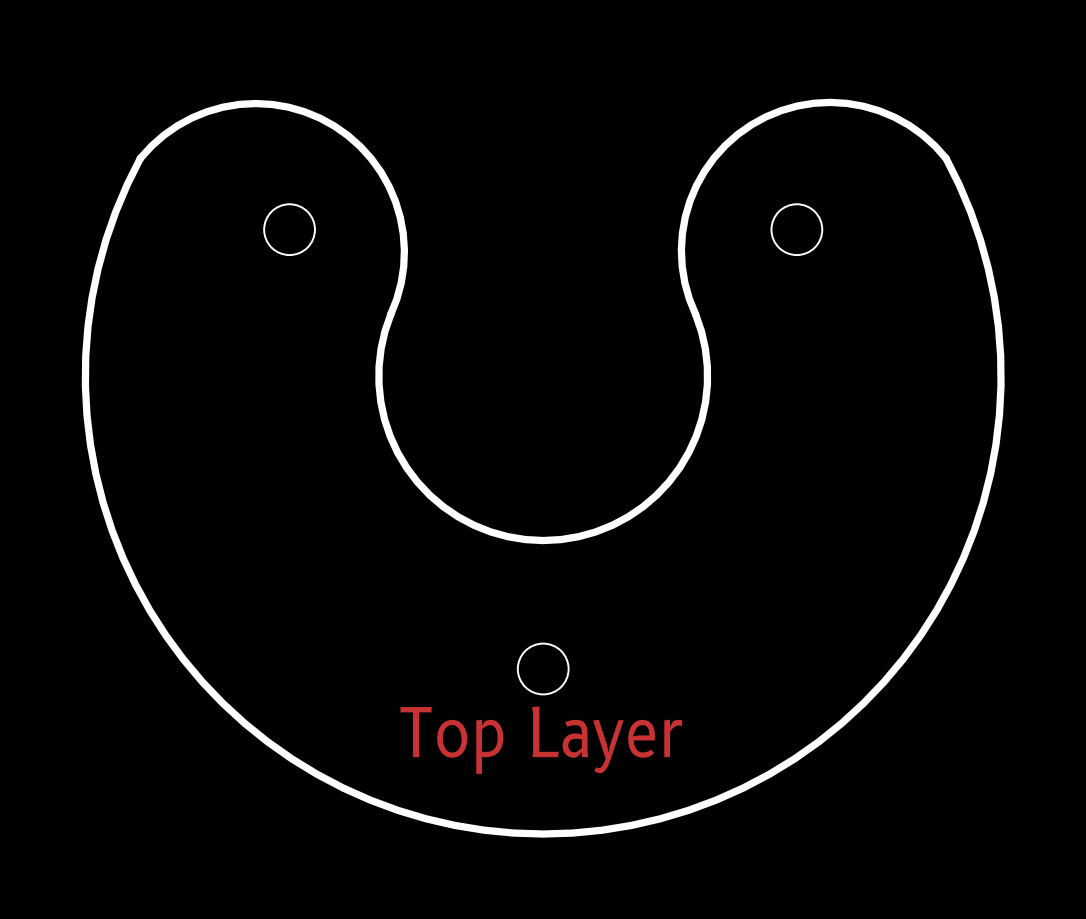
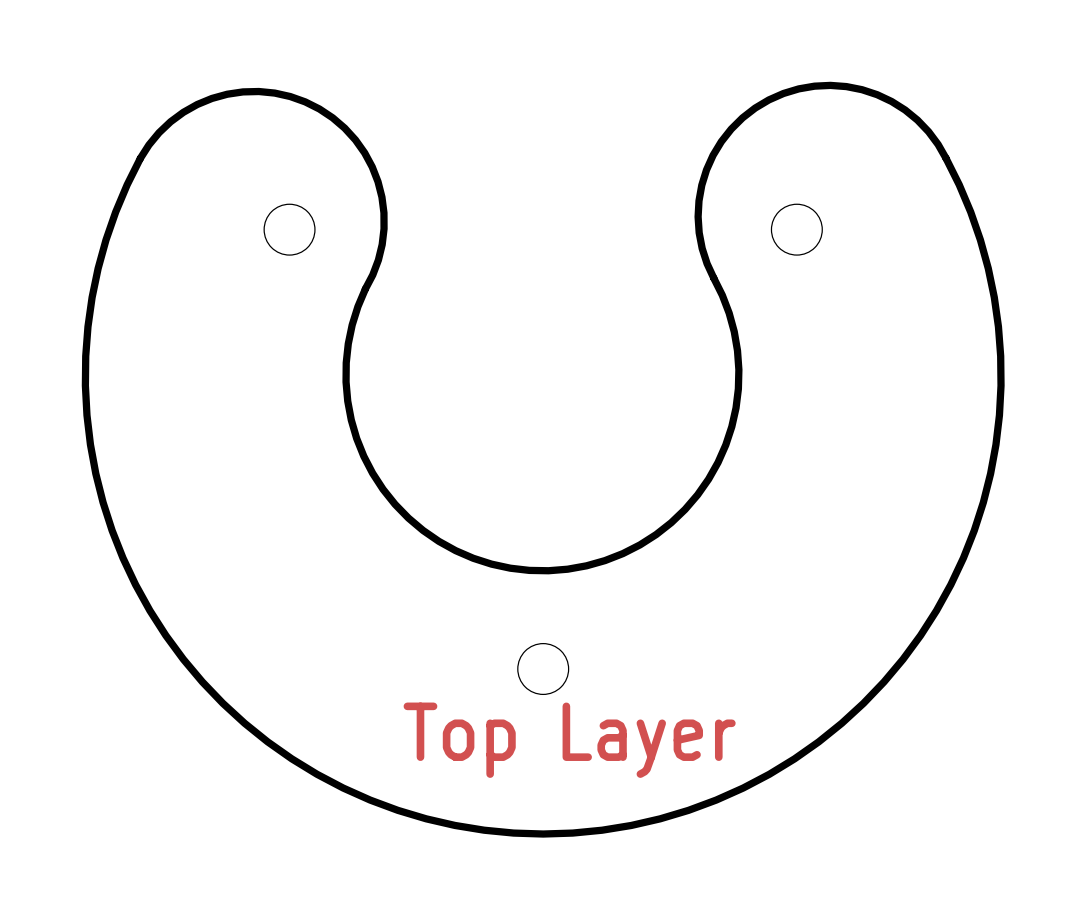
board edge: (140, 158) (163, 135) (177, 125) (207, 111) (239, 104) (272, 104) (304, 111) (334, 126) (360, 146) (380, 172) (389, 186) (400, 217) (403, 233) (403, 266) (401, 283) (385, 331) (379, 366) (380, 402) (384, 419) (397, 452) (417, 482) (443, 506) (458, 516) (490, 531) (525, 539) (543, 540) (561, 539) (595, 531) (628, 516) (642, 506) (668, 482) (688, 452) (701, 419) (705, 402) (707, 366) (701, 331) (684, 283) (681, 250) (682, 233) (689, 201) (696, 185) (714, 157) (725, 145) (751, 124) (781, 110) (797, 106) (830, 102) (863, 106) (894, 117) (922, 134) (946, 158) -> (140, 158) (148, 144) (170, 121) (197, 104) (227, 94) (258, 91) (290, 96) (319, 109) (344, 128) (355, 139) (372, 166) (381, 197) (383, 212) (384, 228) (378, 260) (357, 306) (352, 324) (346, 362) (346, 382) (351, 420) (363, 456) (383, 489) (395, 504) (408, 518) (438, 541) (473, 558) (491, 564) (510, 568) (548, 570) (586, 565) (605, 560) (622, 553) (656, 534) (685, 509) (697, 494) (718, 462) (725, 444) (731, 426) (738, 388) (737, 350) (729, 313) (702, 248) (698, 216) (701, 185) (706, 169) (713, 155) (731, 129) (755, 108) (783, 93) (814, 86) (846, 86) (877, 94) (905, 110) (928, 131) (946, 158)

